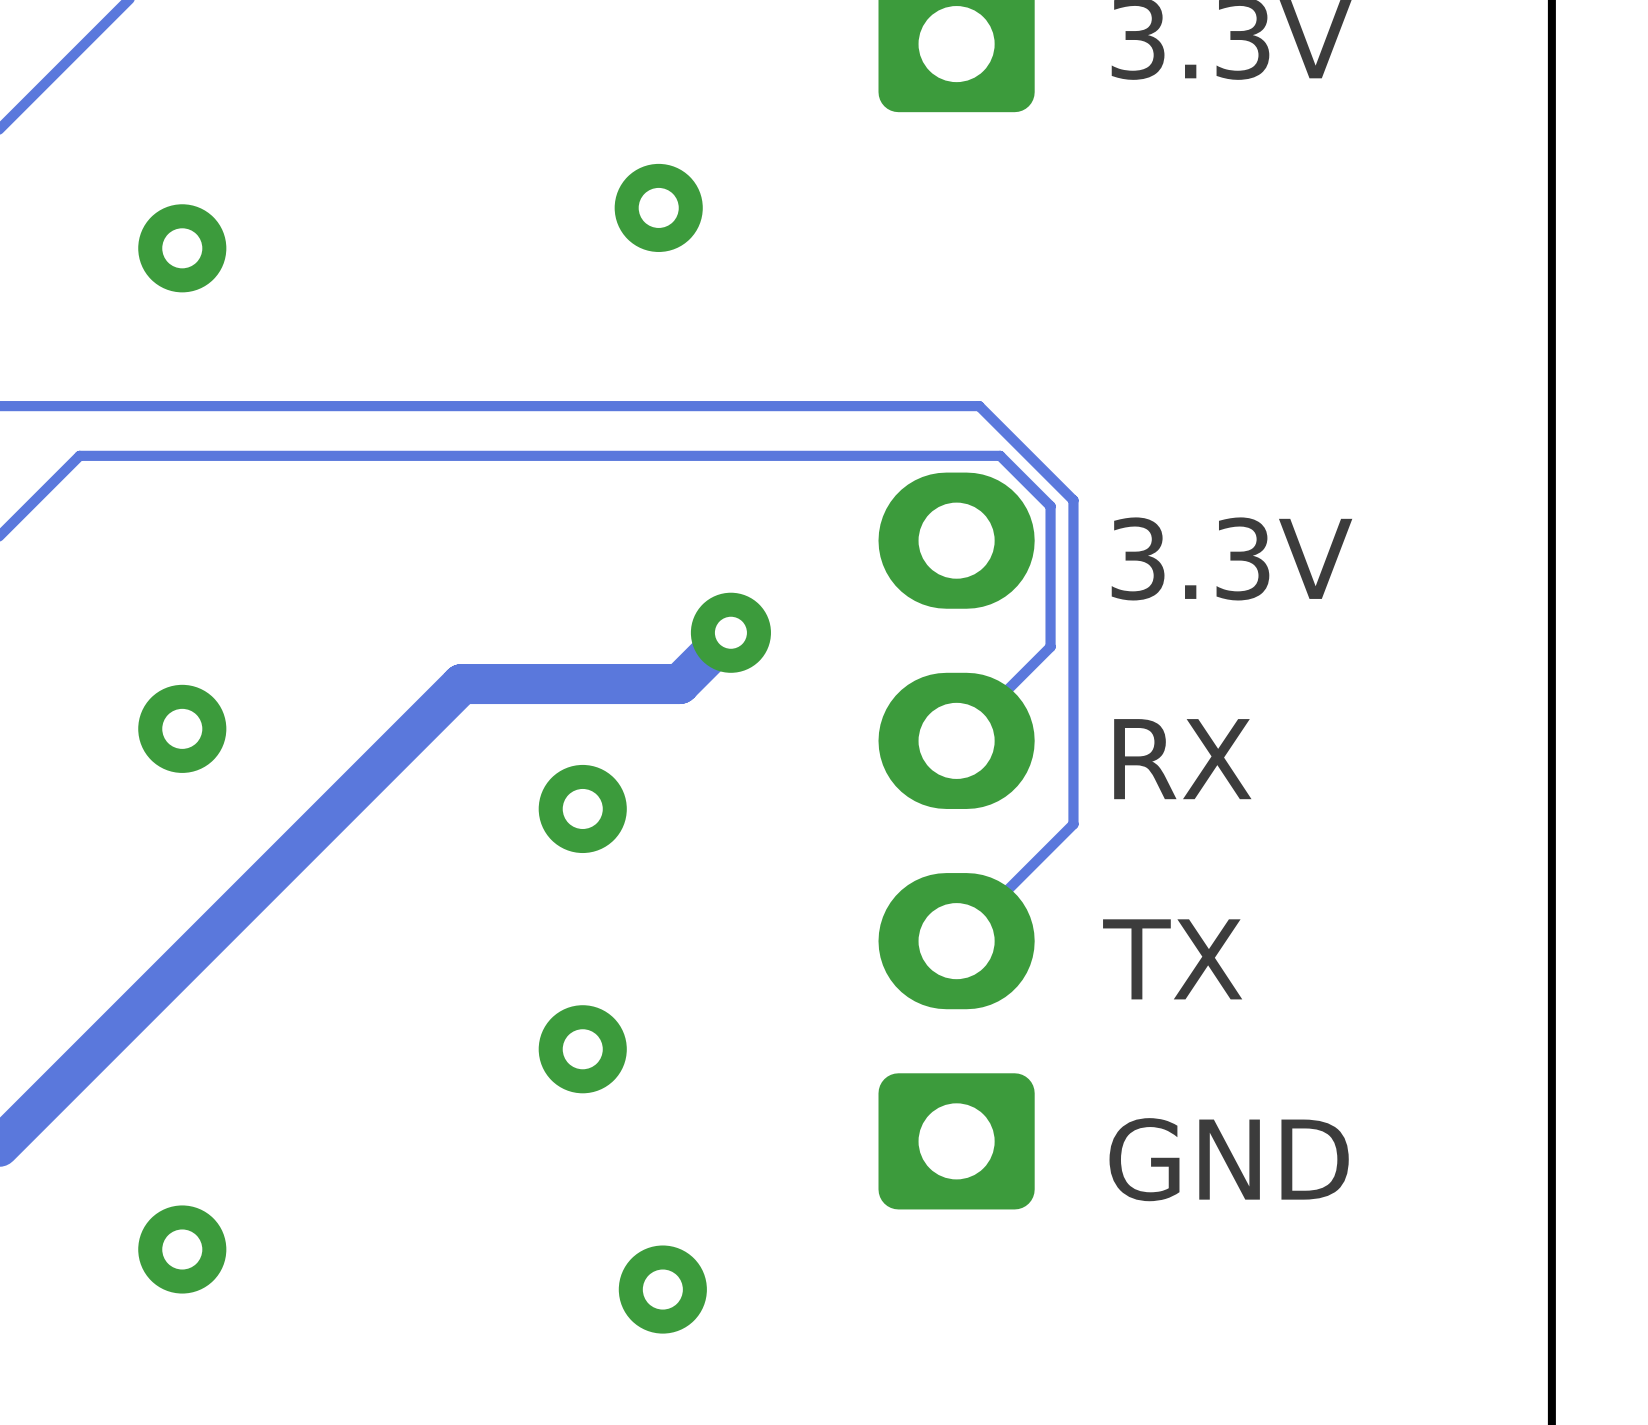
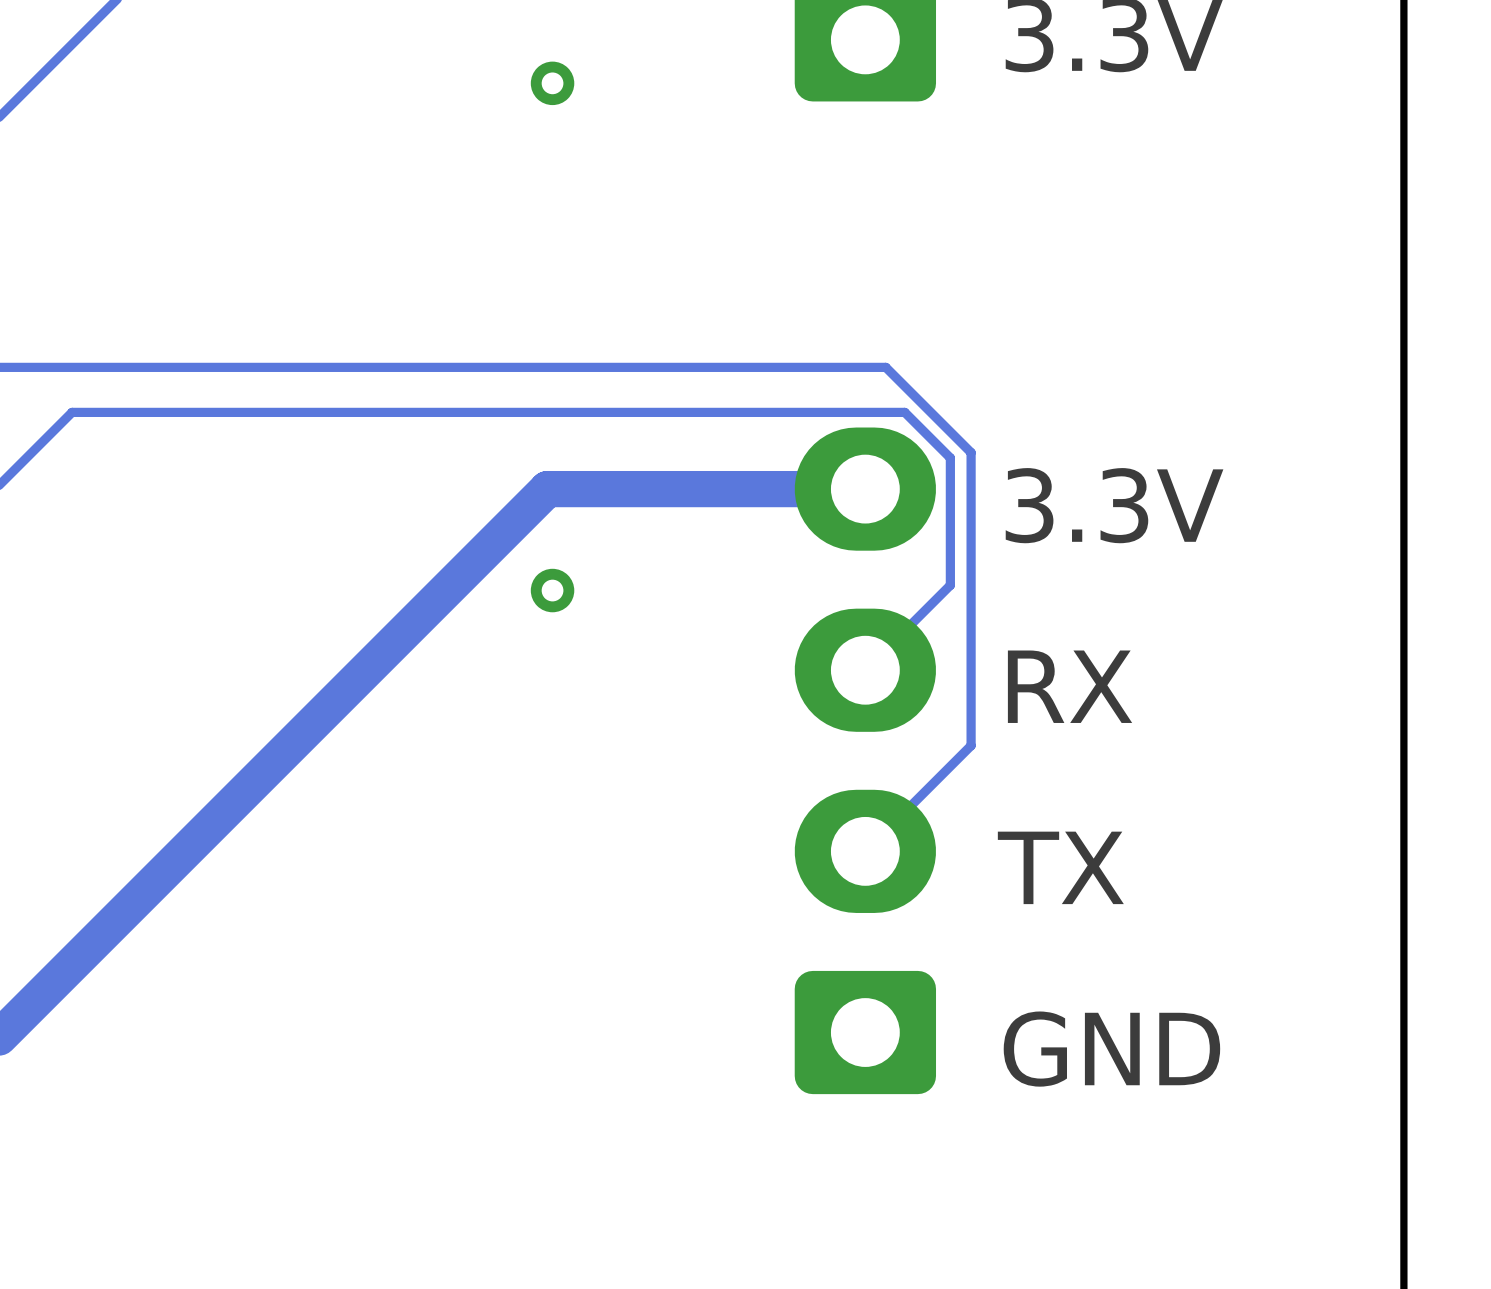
via: none -> (552, 83)
via: (658, 207) -> none
via: (182, 248) -> none
track: (730, 632) (679, 684) (461, 684) -> (865, 489) (547, 489) (417, 618)
via: (730, 632) -> none
via: none -> (552, 590)
via: (182, 728) -> none
via: (582, 808) -> none
via: (582, 1049) -> none
via: (182, 1249) -> none
via: (662, 1289) -> none

